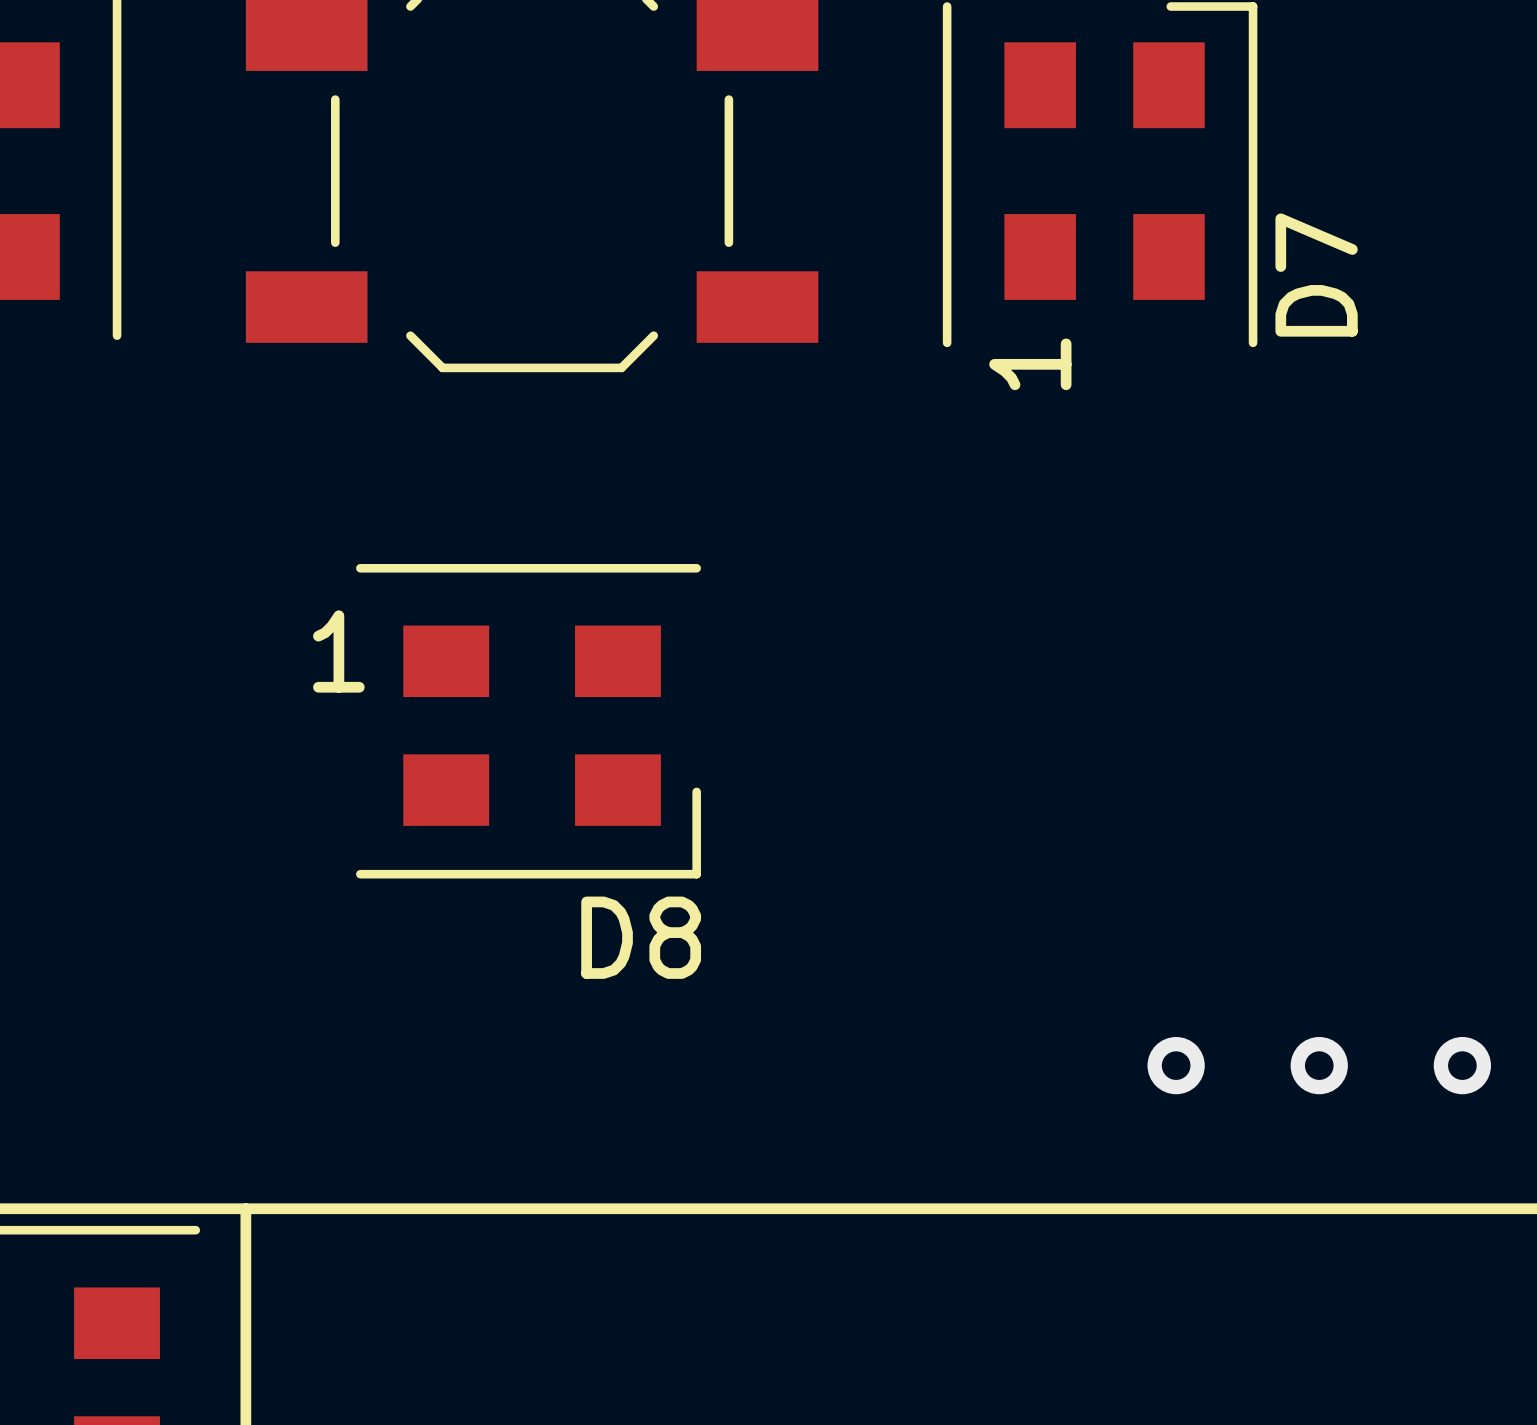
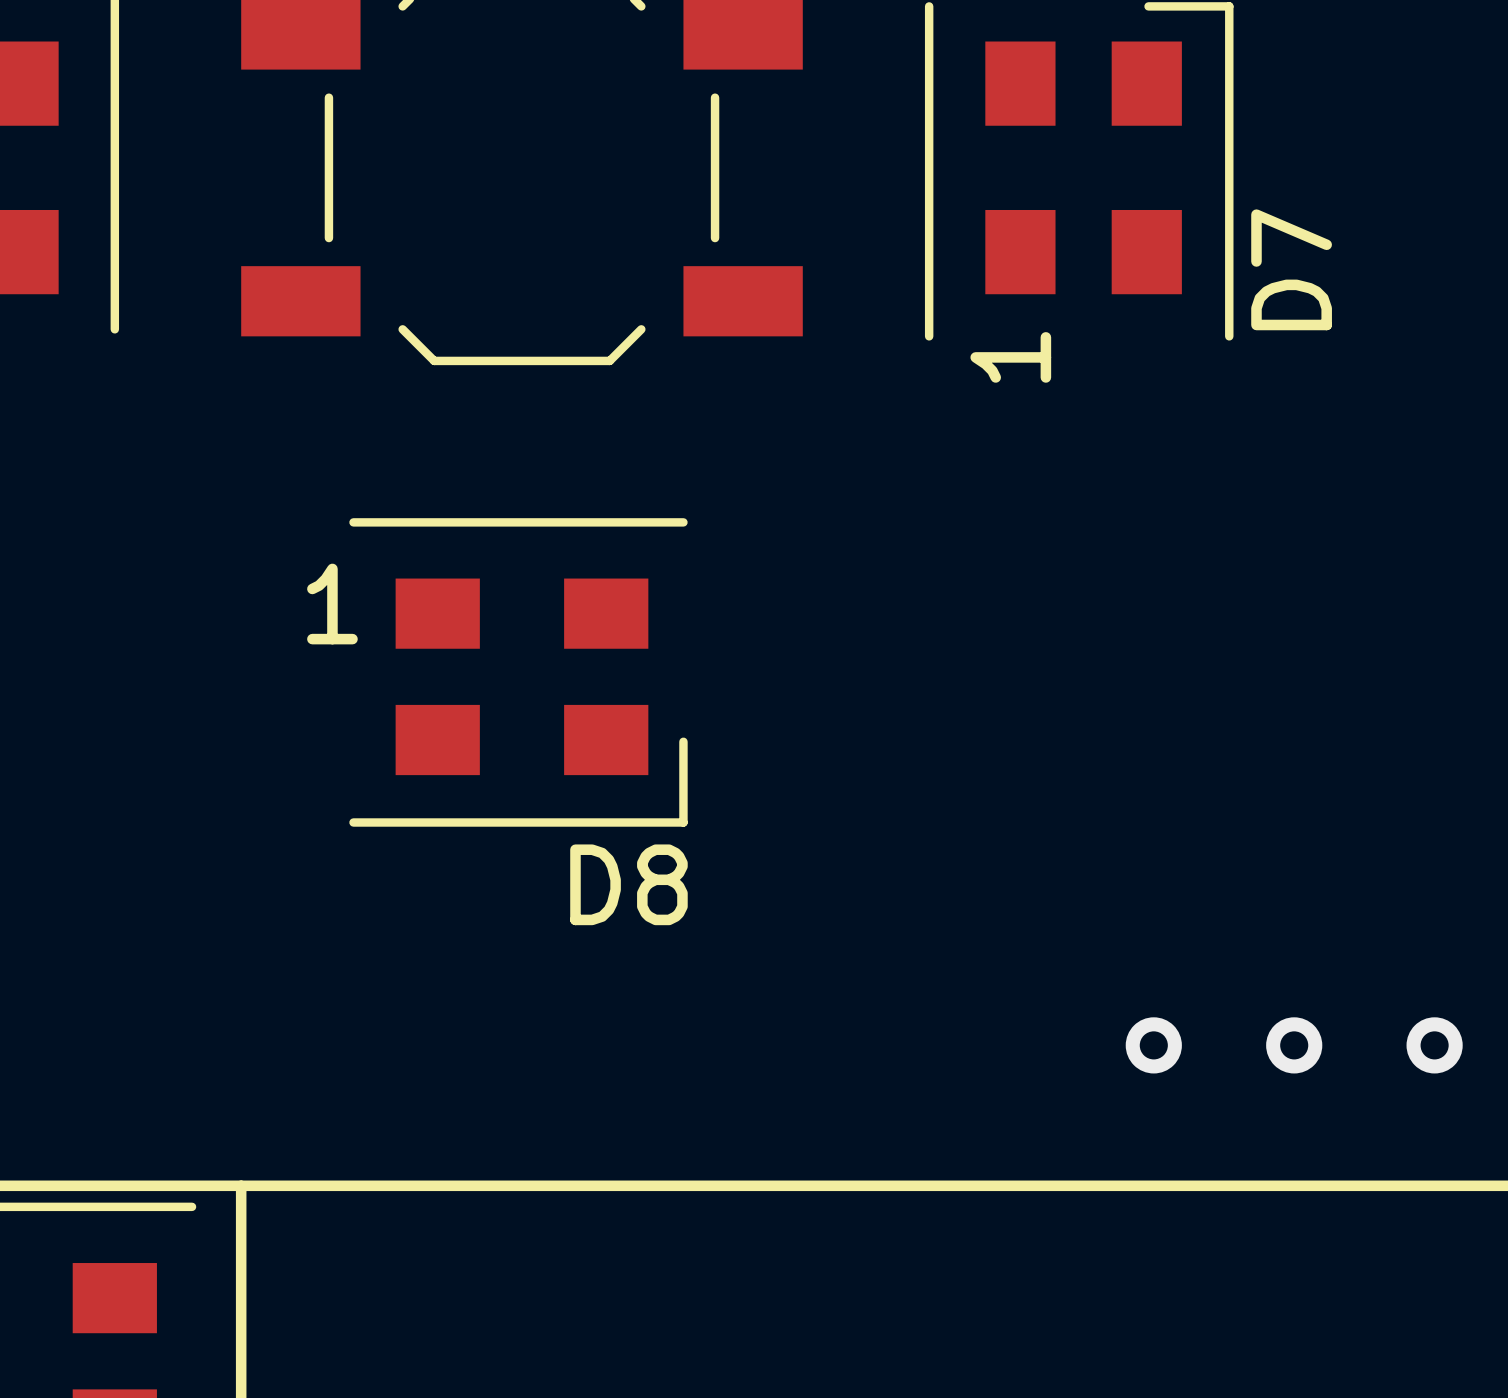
D8 position: (528, 721) -> (518, 672)

